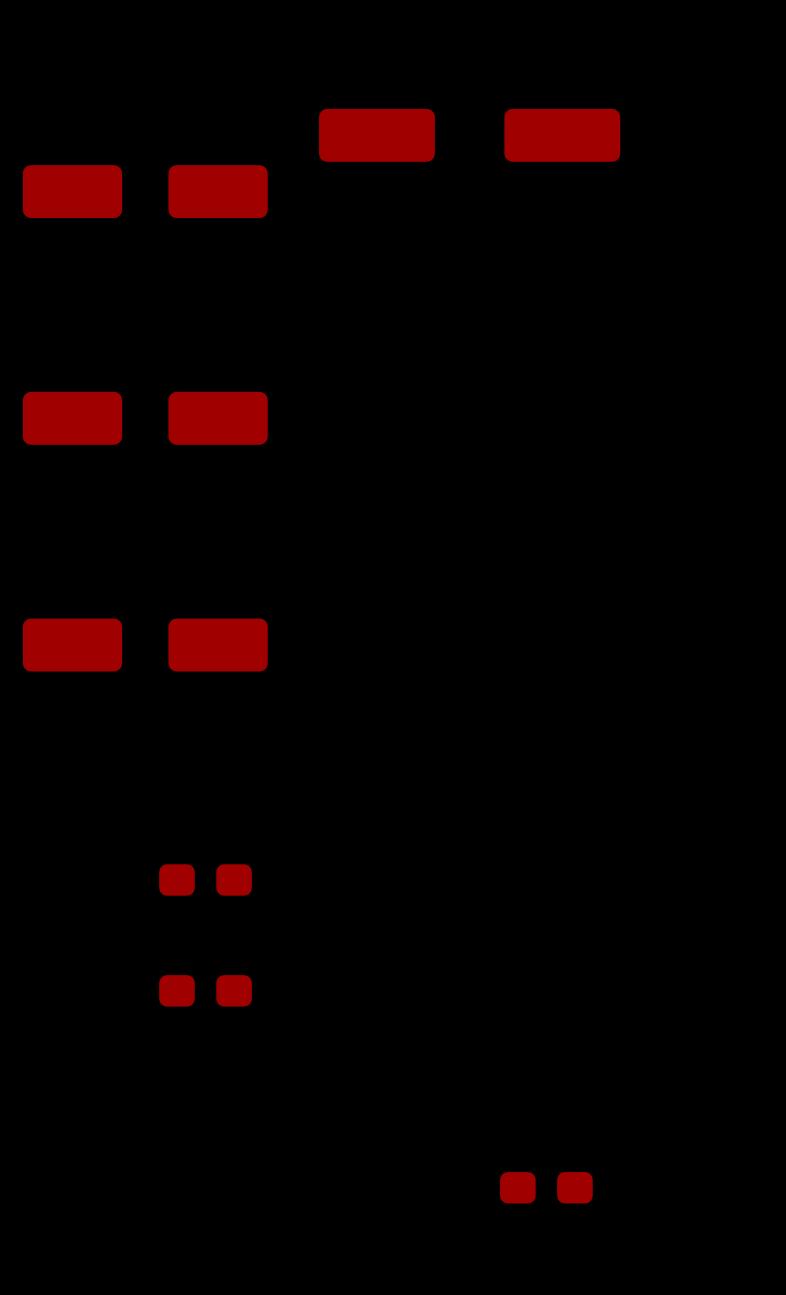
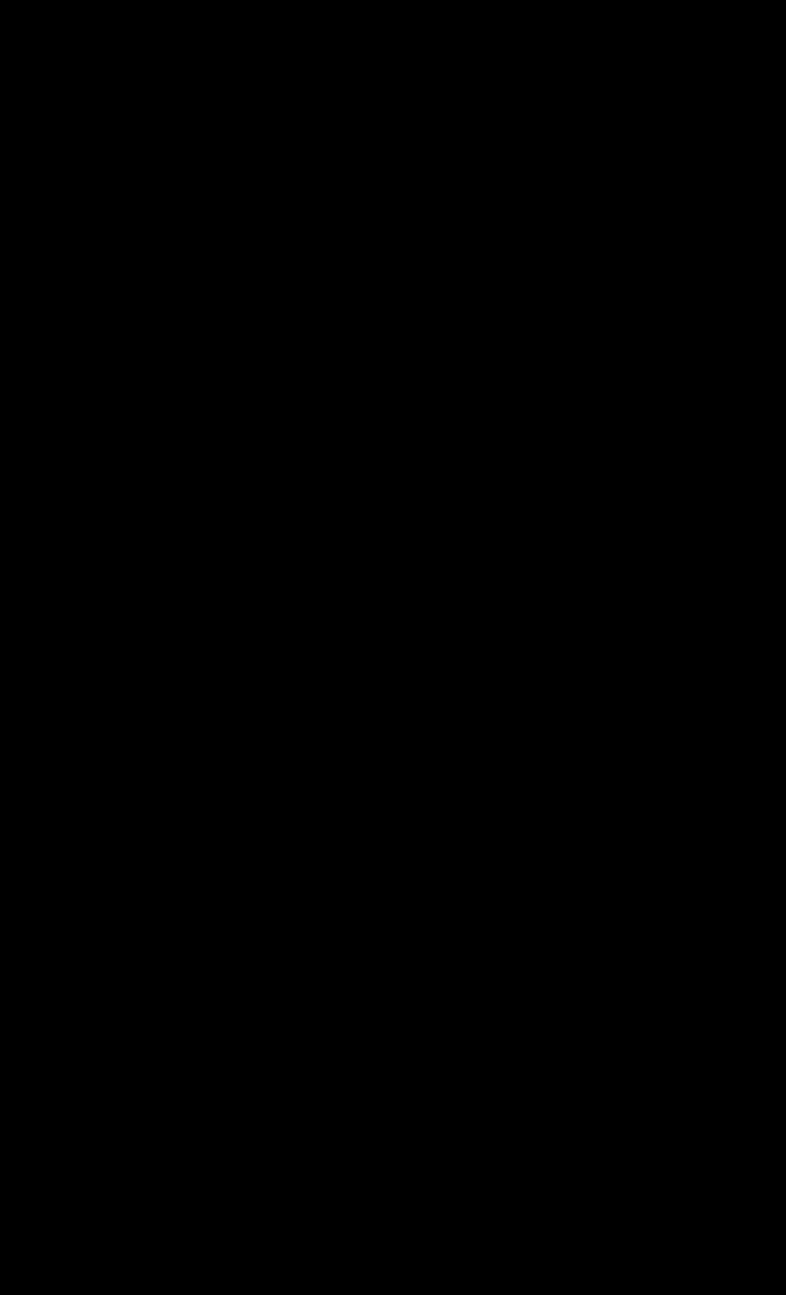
part: (469, 135) -> none
part: (145, 191) -> none
part: (145, 418) -> none
part: (145, 645) -> none
part: (205, 879) -> none
part: (205, 990) -> none
part: (546, 1187) -> none

